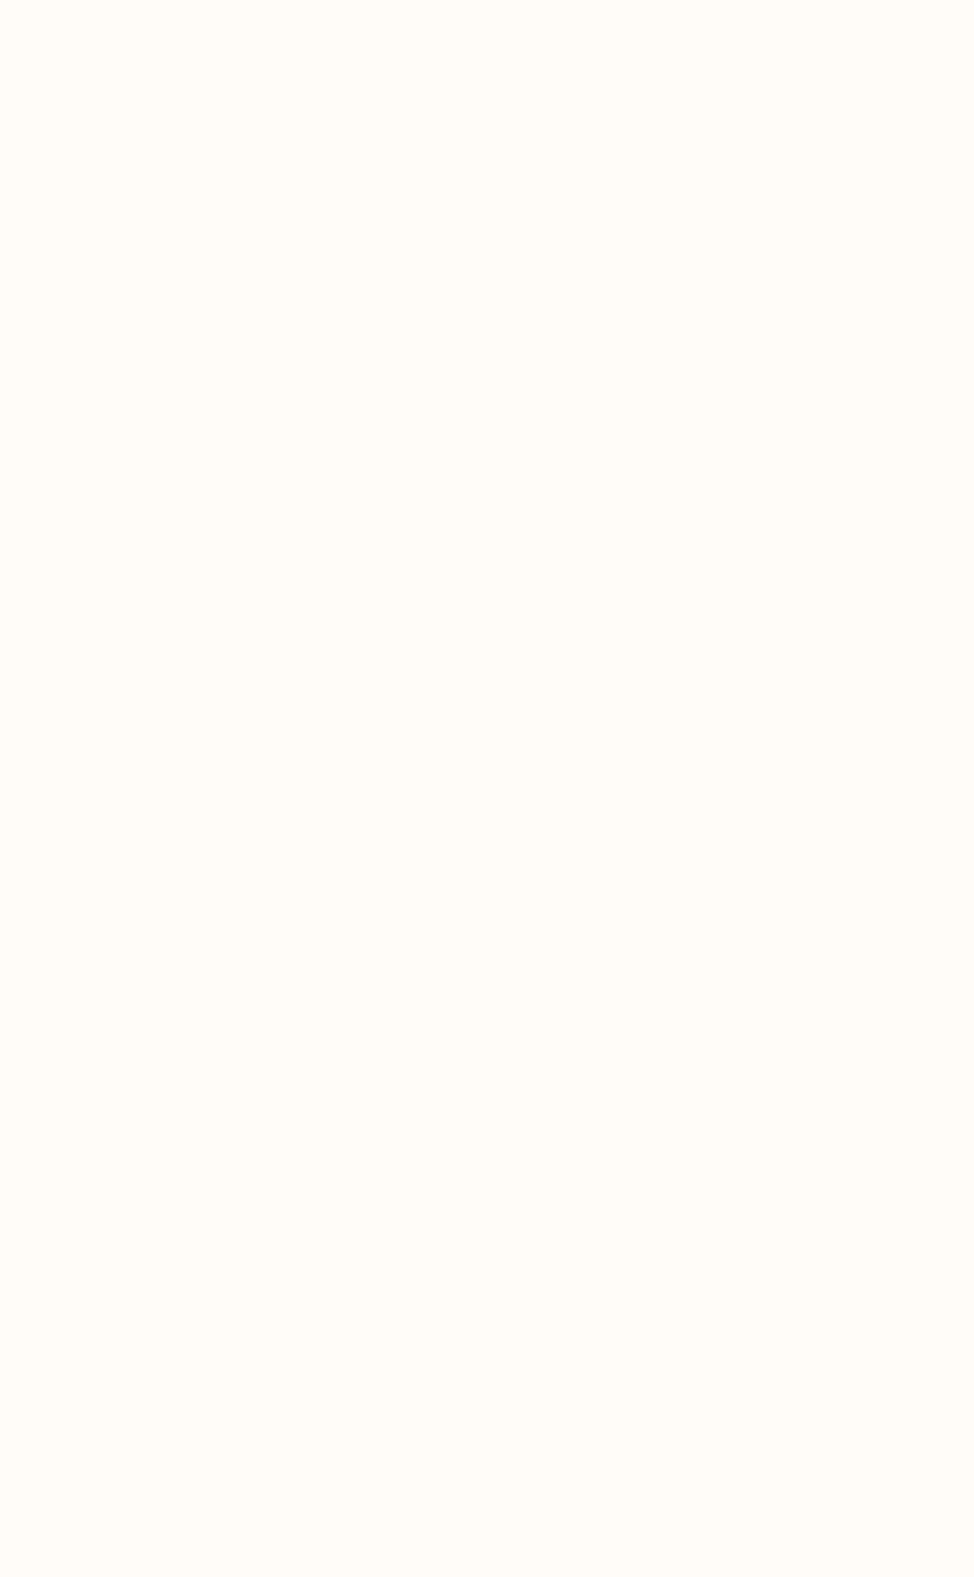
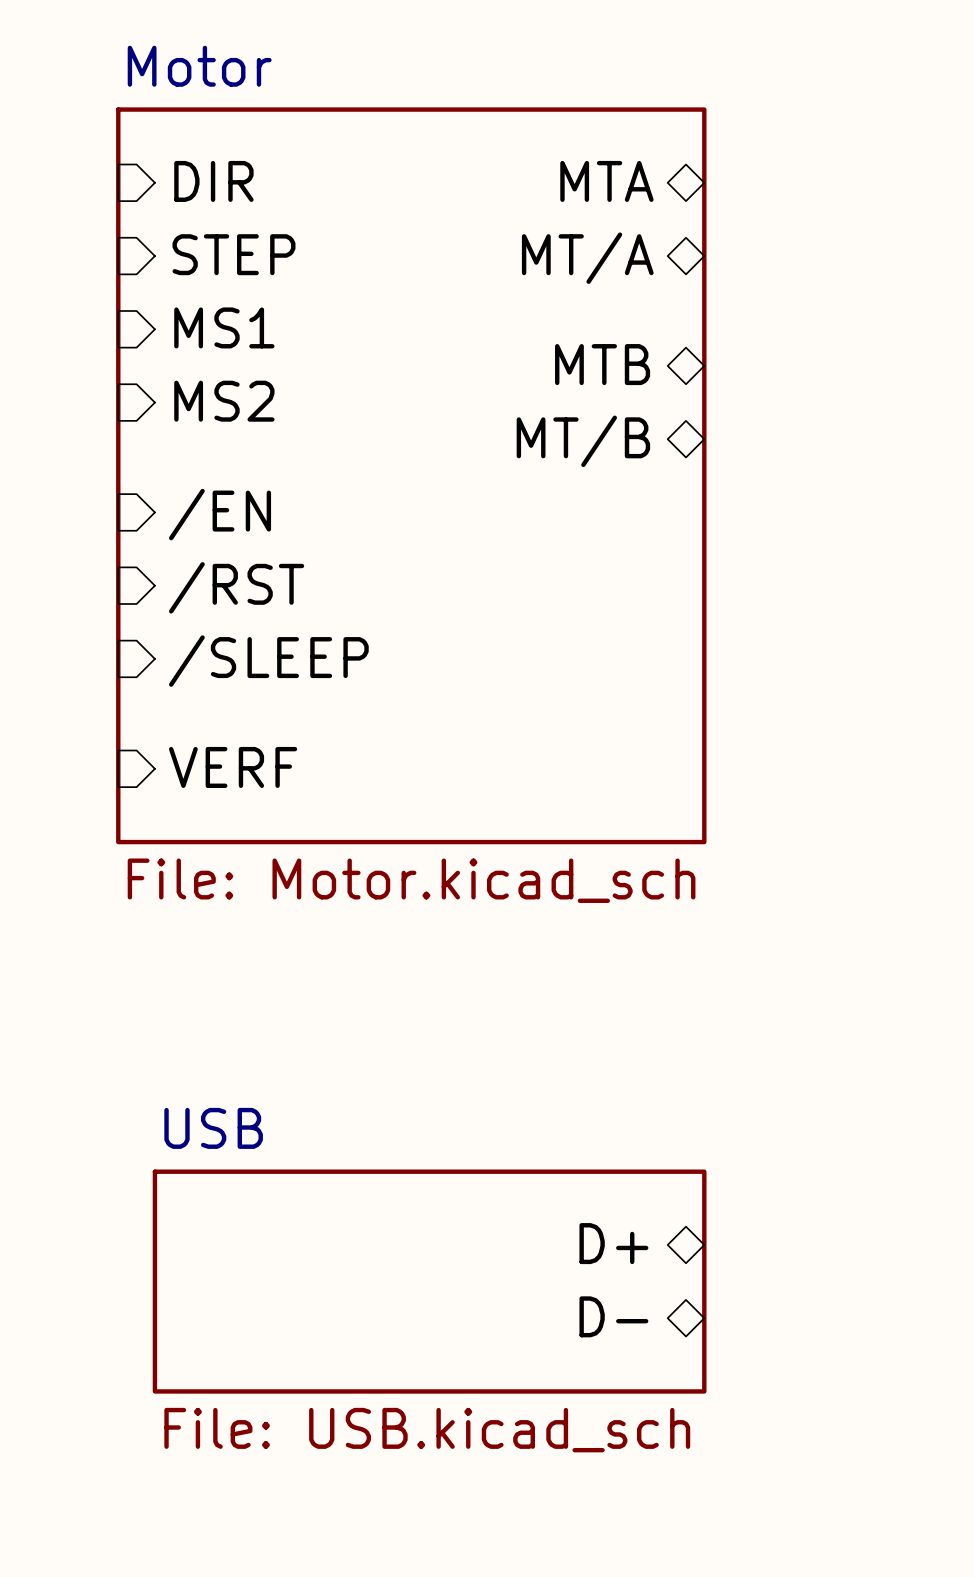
sheet pin: none -> DIR (213, 181)
sheet pin: none -> MTA (606, 181)
sheet pin: none -> STEP (233, 254)
sheet pin: none -> MT/A (587, 258)
sheet pin: none -> MS1 (224, 327)
sheet pin: none -> MTB (602, 364)
sheet pin: none -> MS2 (224, 401)
sheet pin: none -> MT/B (583, 441)
sheet Motor: none -> File: Motor.kicad_sch (411, 475)
sheet pin: none -> /EN (220, 514)
sheet pin: none -> /RST (236, 587)
sheet pin: none -> /SLEEP (268, 661)
sheet pin: none -> VERF (233, 767)
sheet pin: none -> D+ (613, 1243)
sheet USB: none -> File: USB.kicad_sch (429, 1281)
sheet pin: none -> D- (613, 1316)

